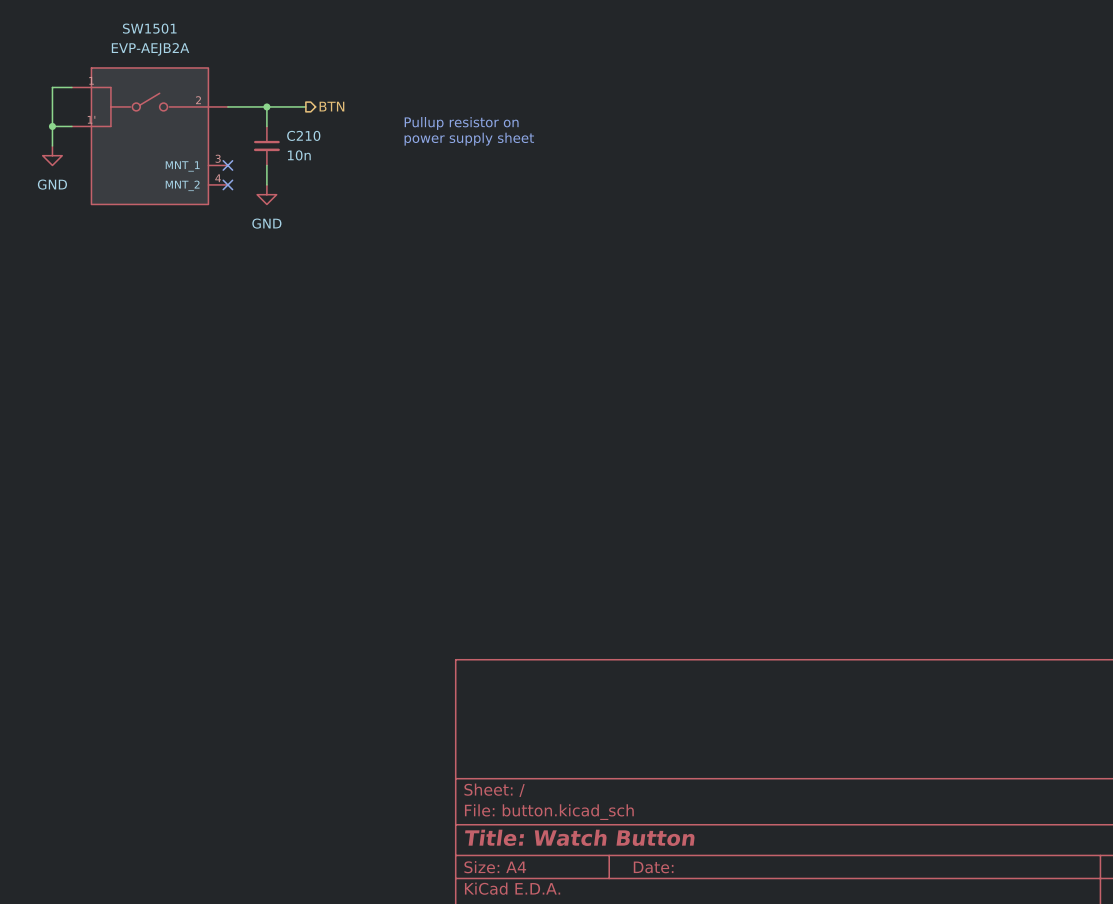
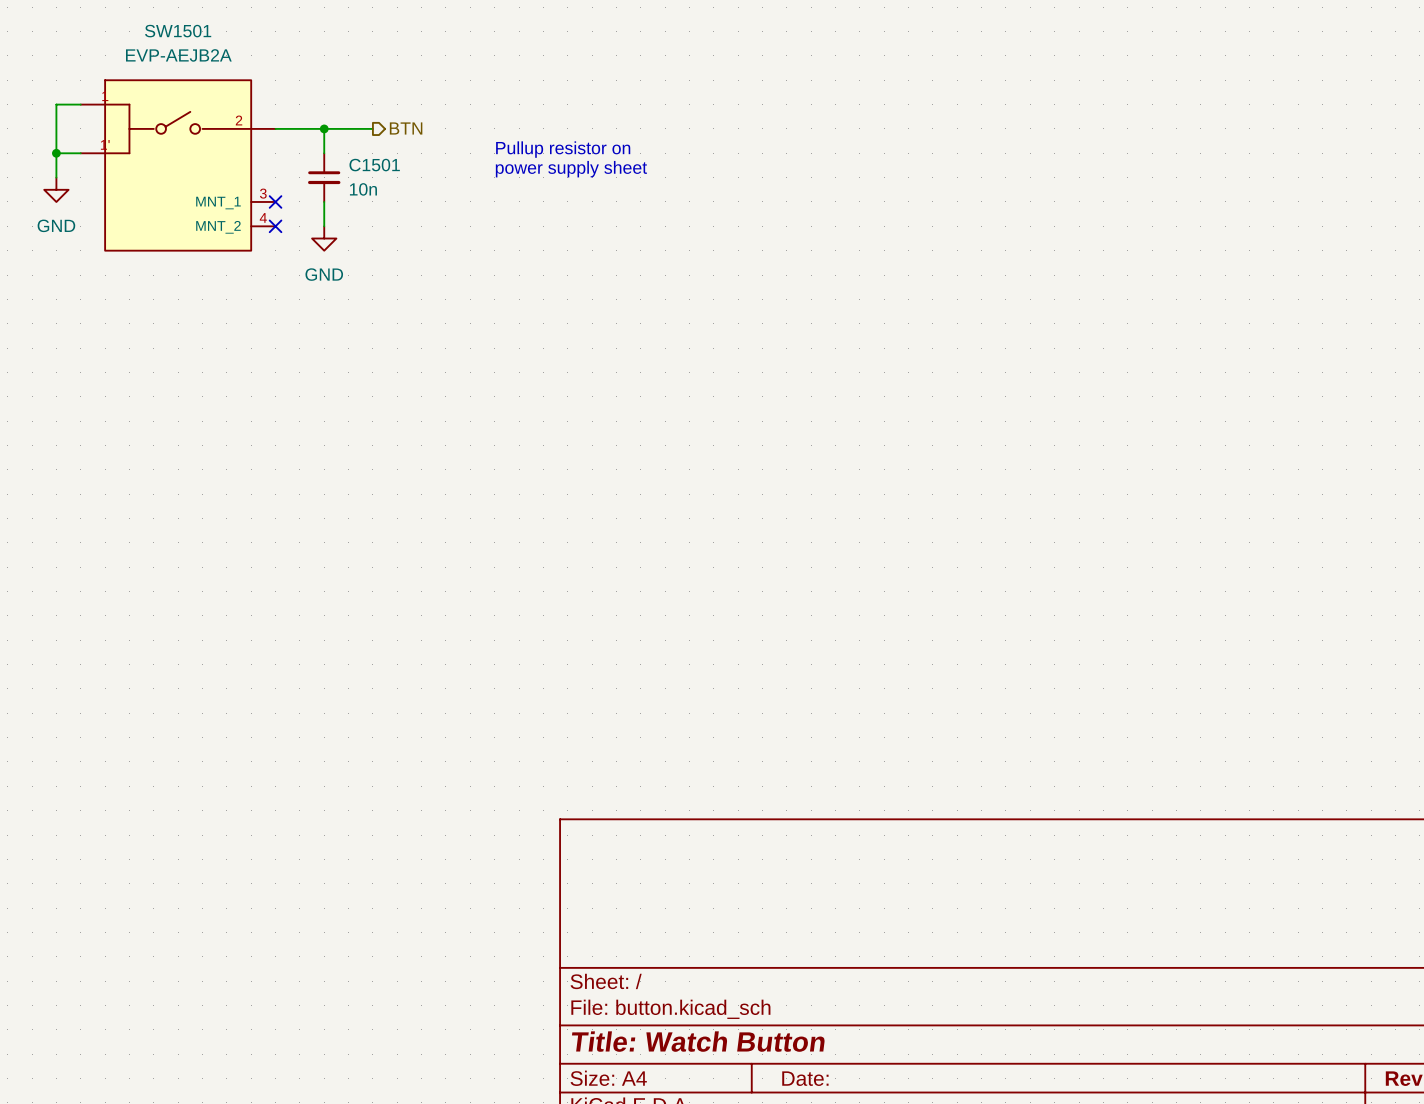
C210 name: C210 (303, 135) -> C1501 (374, 165)

